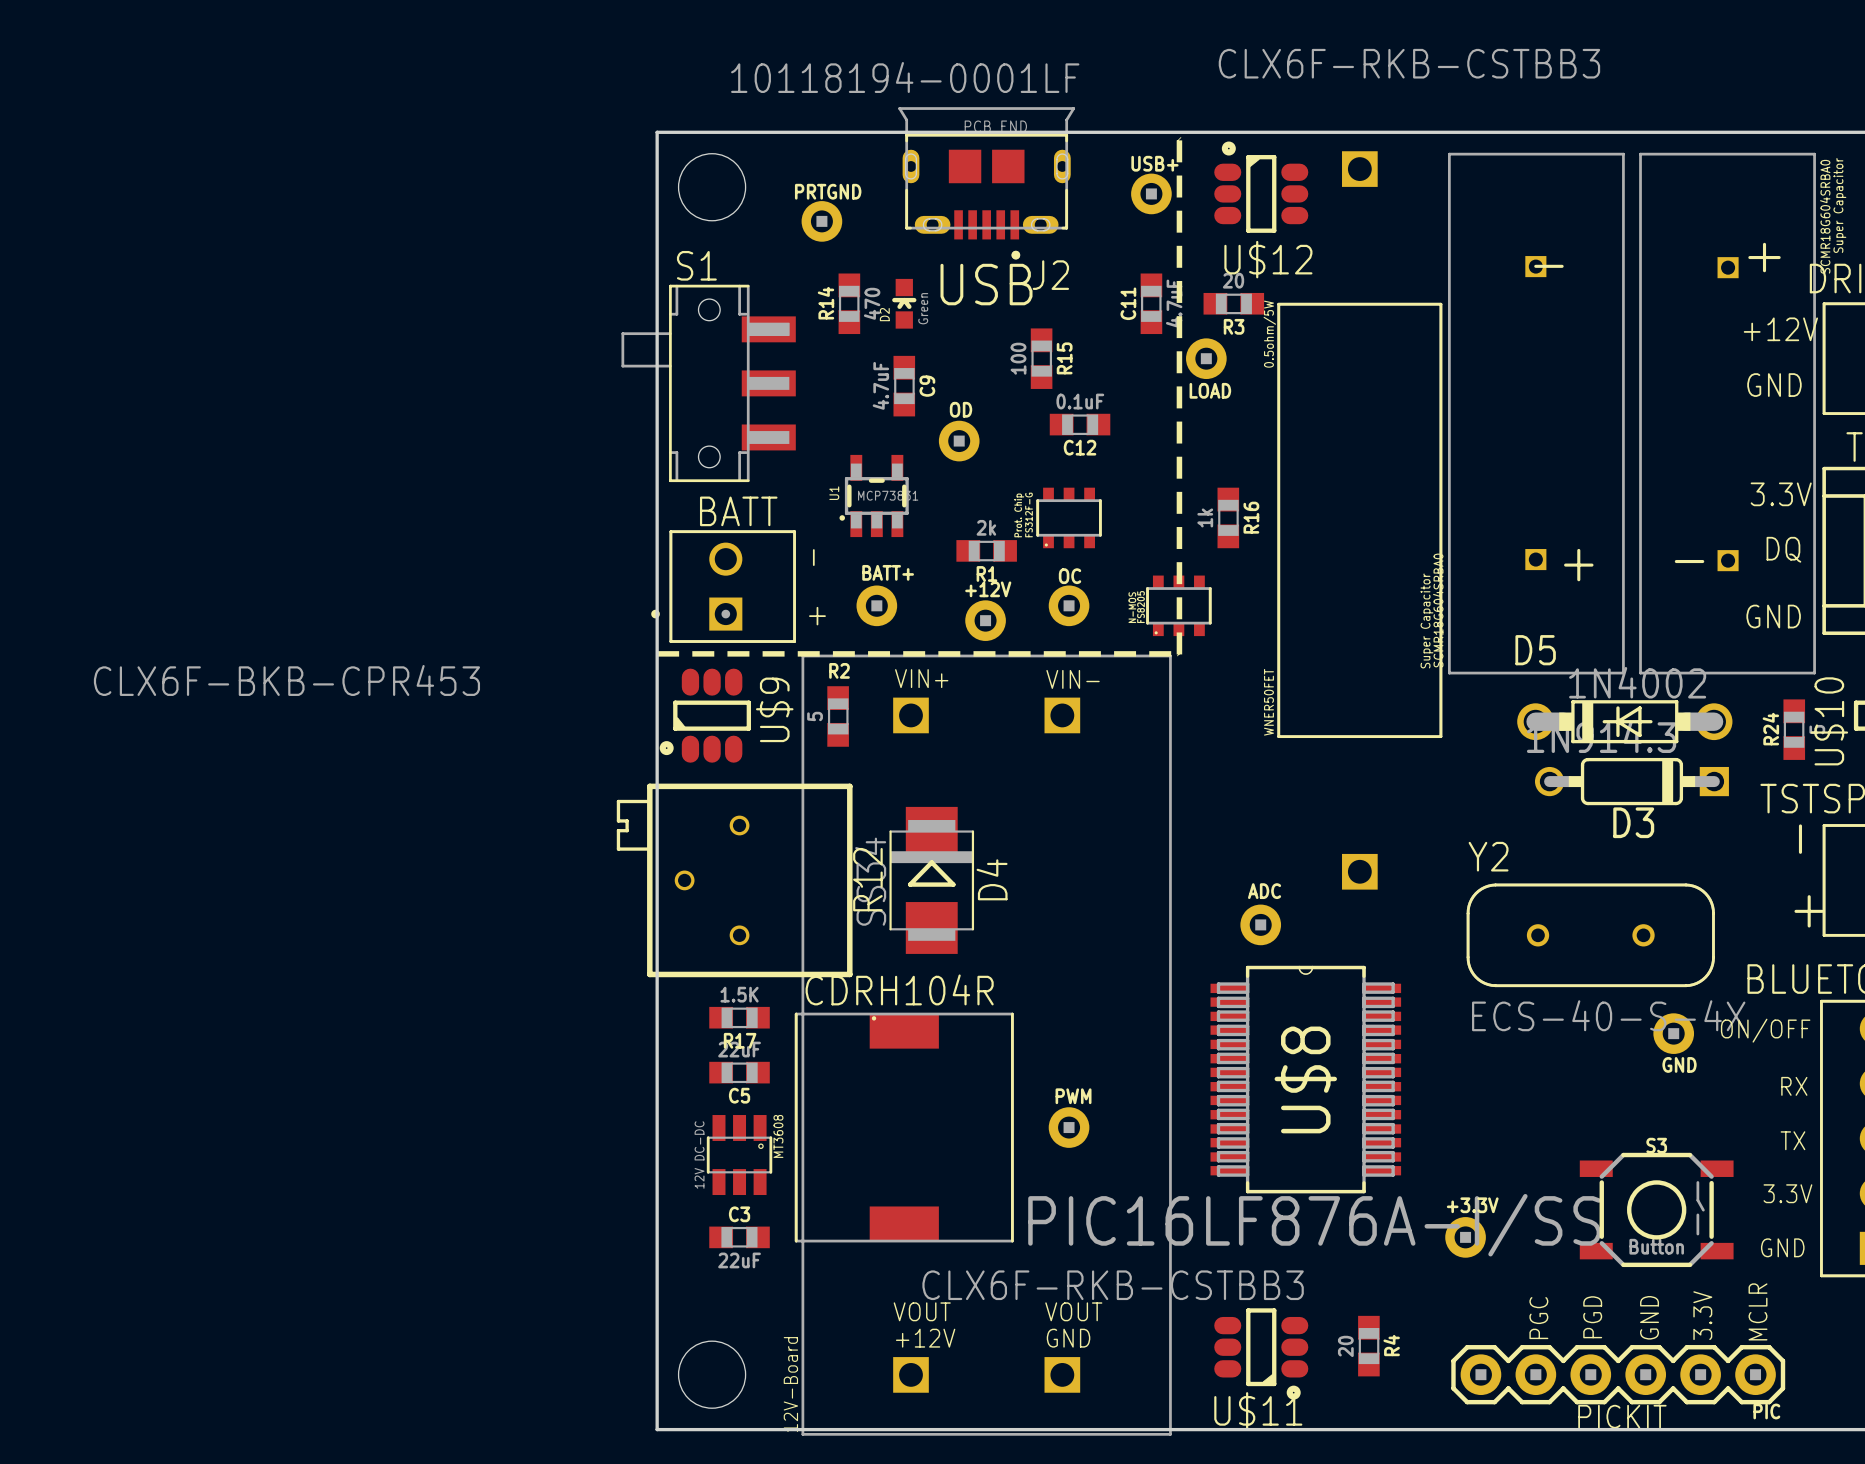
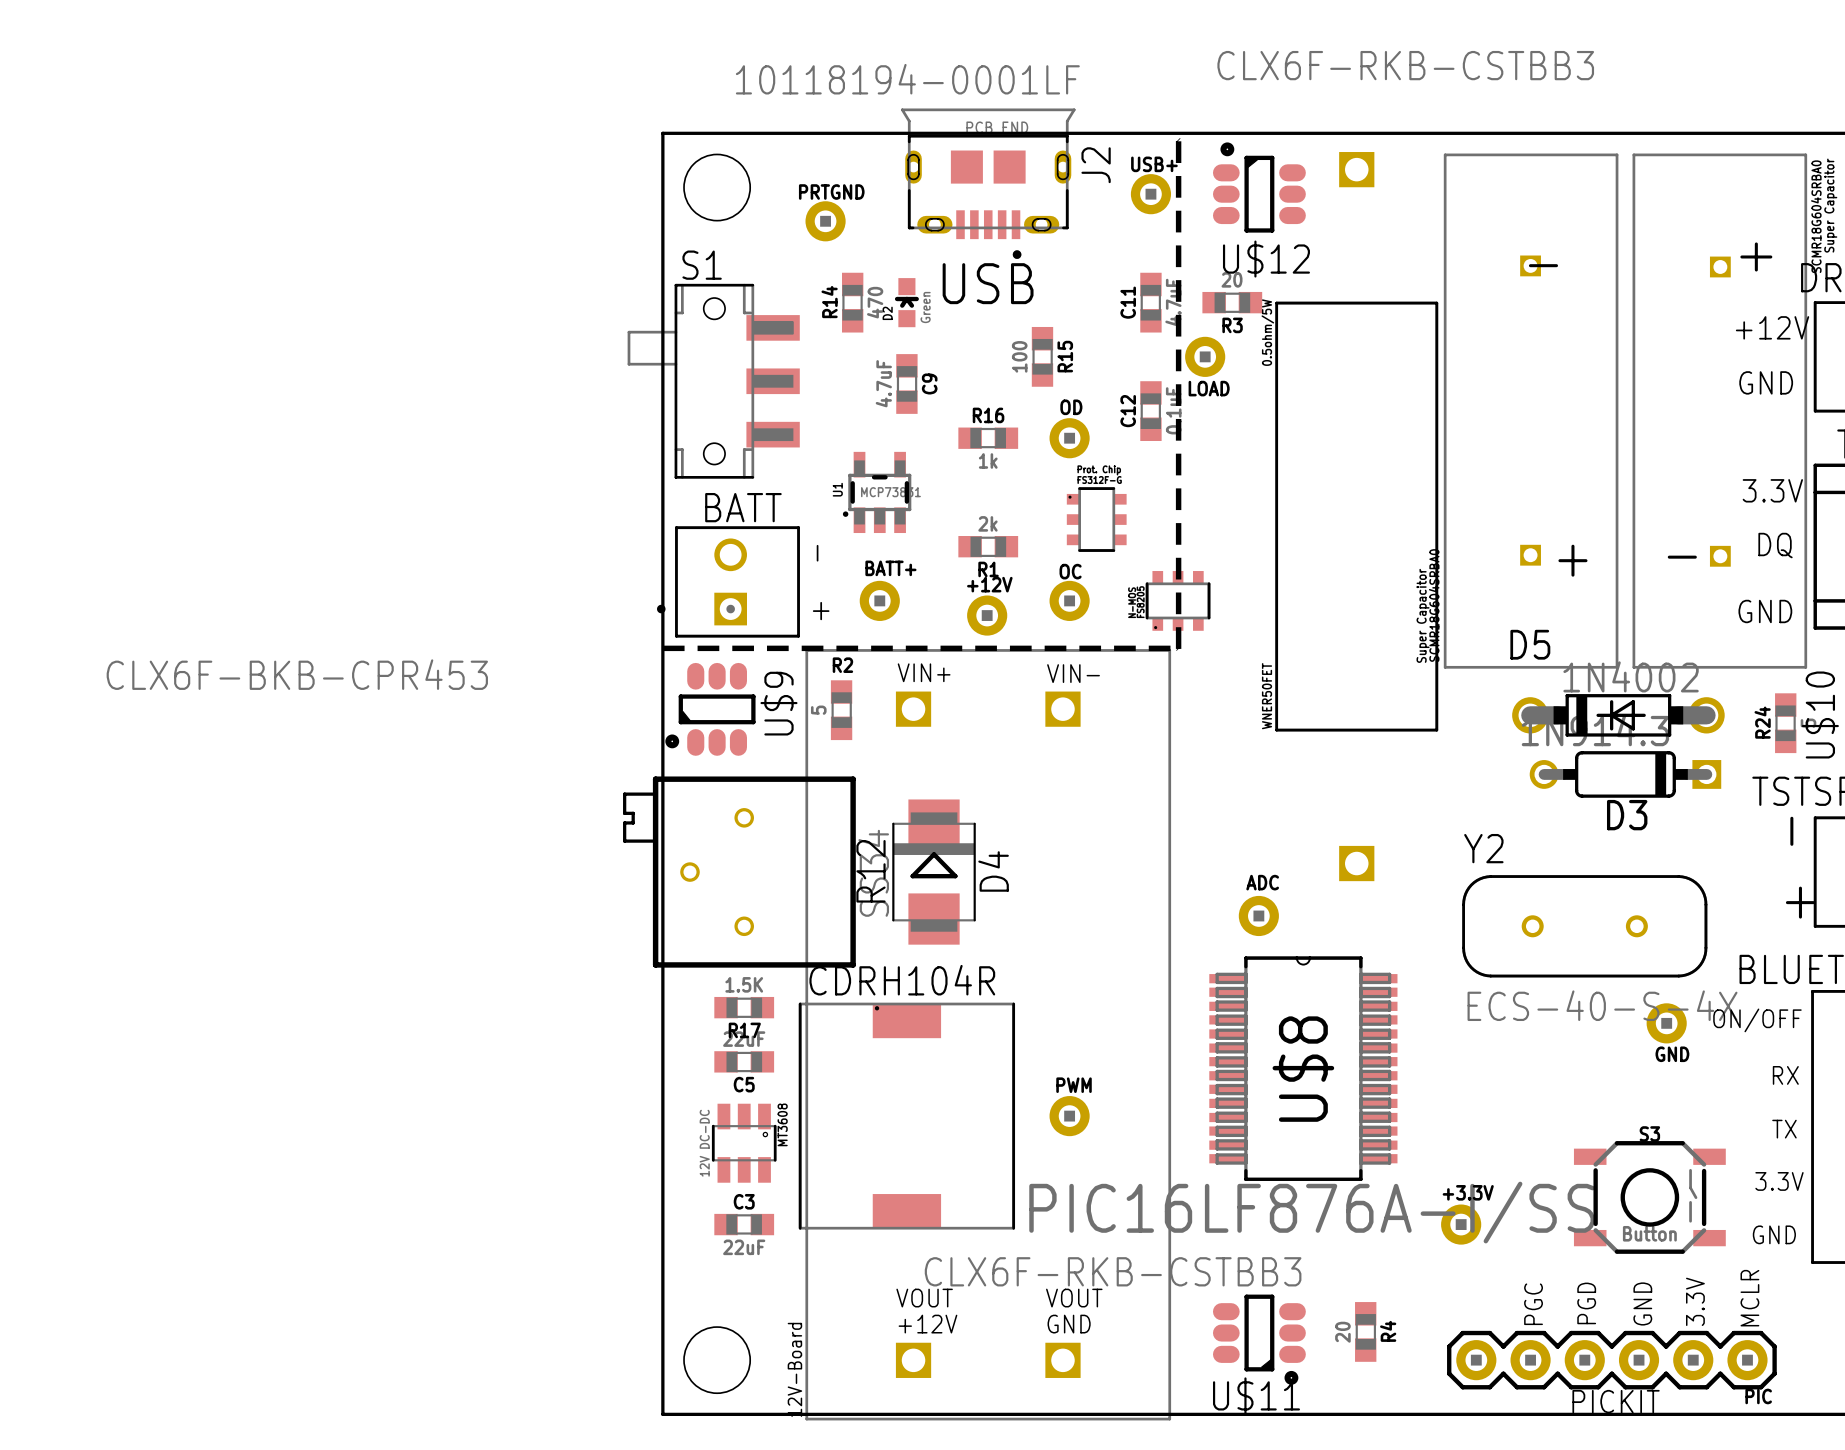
J2 name rotation: 0° (1050, 275) -> 90° counterclockwise (1096, 165)
J2 name position: J2 (1050, 275) -> J2 (1096, 165)
C12 rotation: 0° (1080, 424) -> 90° clockwise (1150, 411)
C12 position: (1080, 424) -> (1150, 411)
OD position: (959, 441) -> (1069, 438)
part rotation: 0° (1069, 517) -> 90° clockwise (1096, 519)
R16 rotation: 0° (1228, 517) -> 90° clockwise (988, 438)
R16 position: (1228, 517) -> (988, 438)

